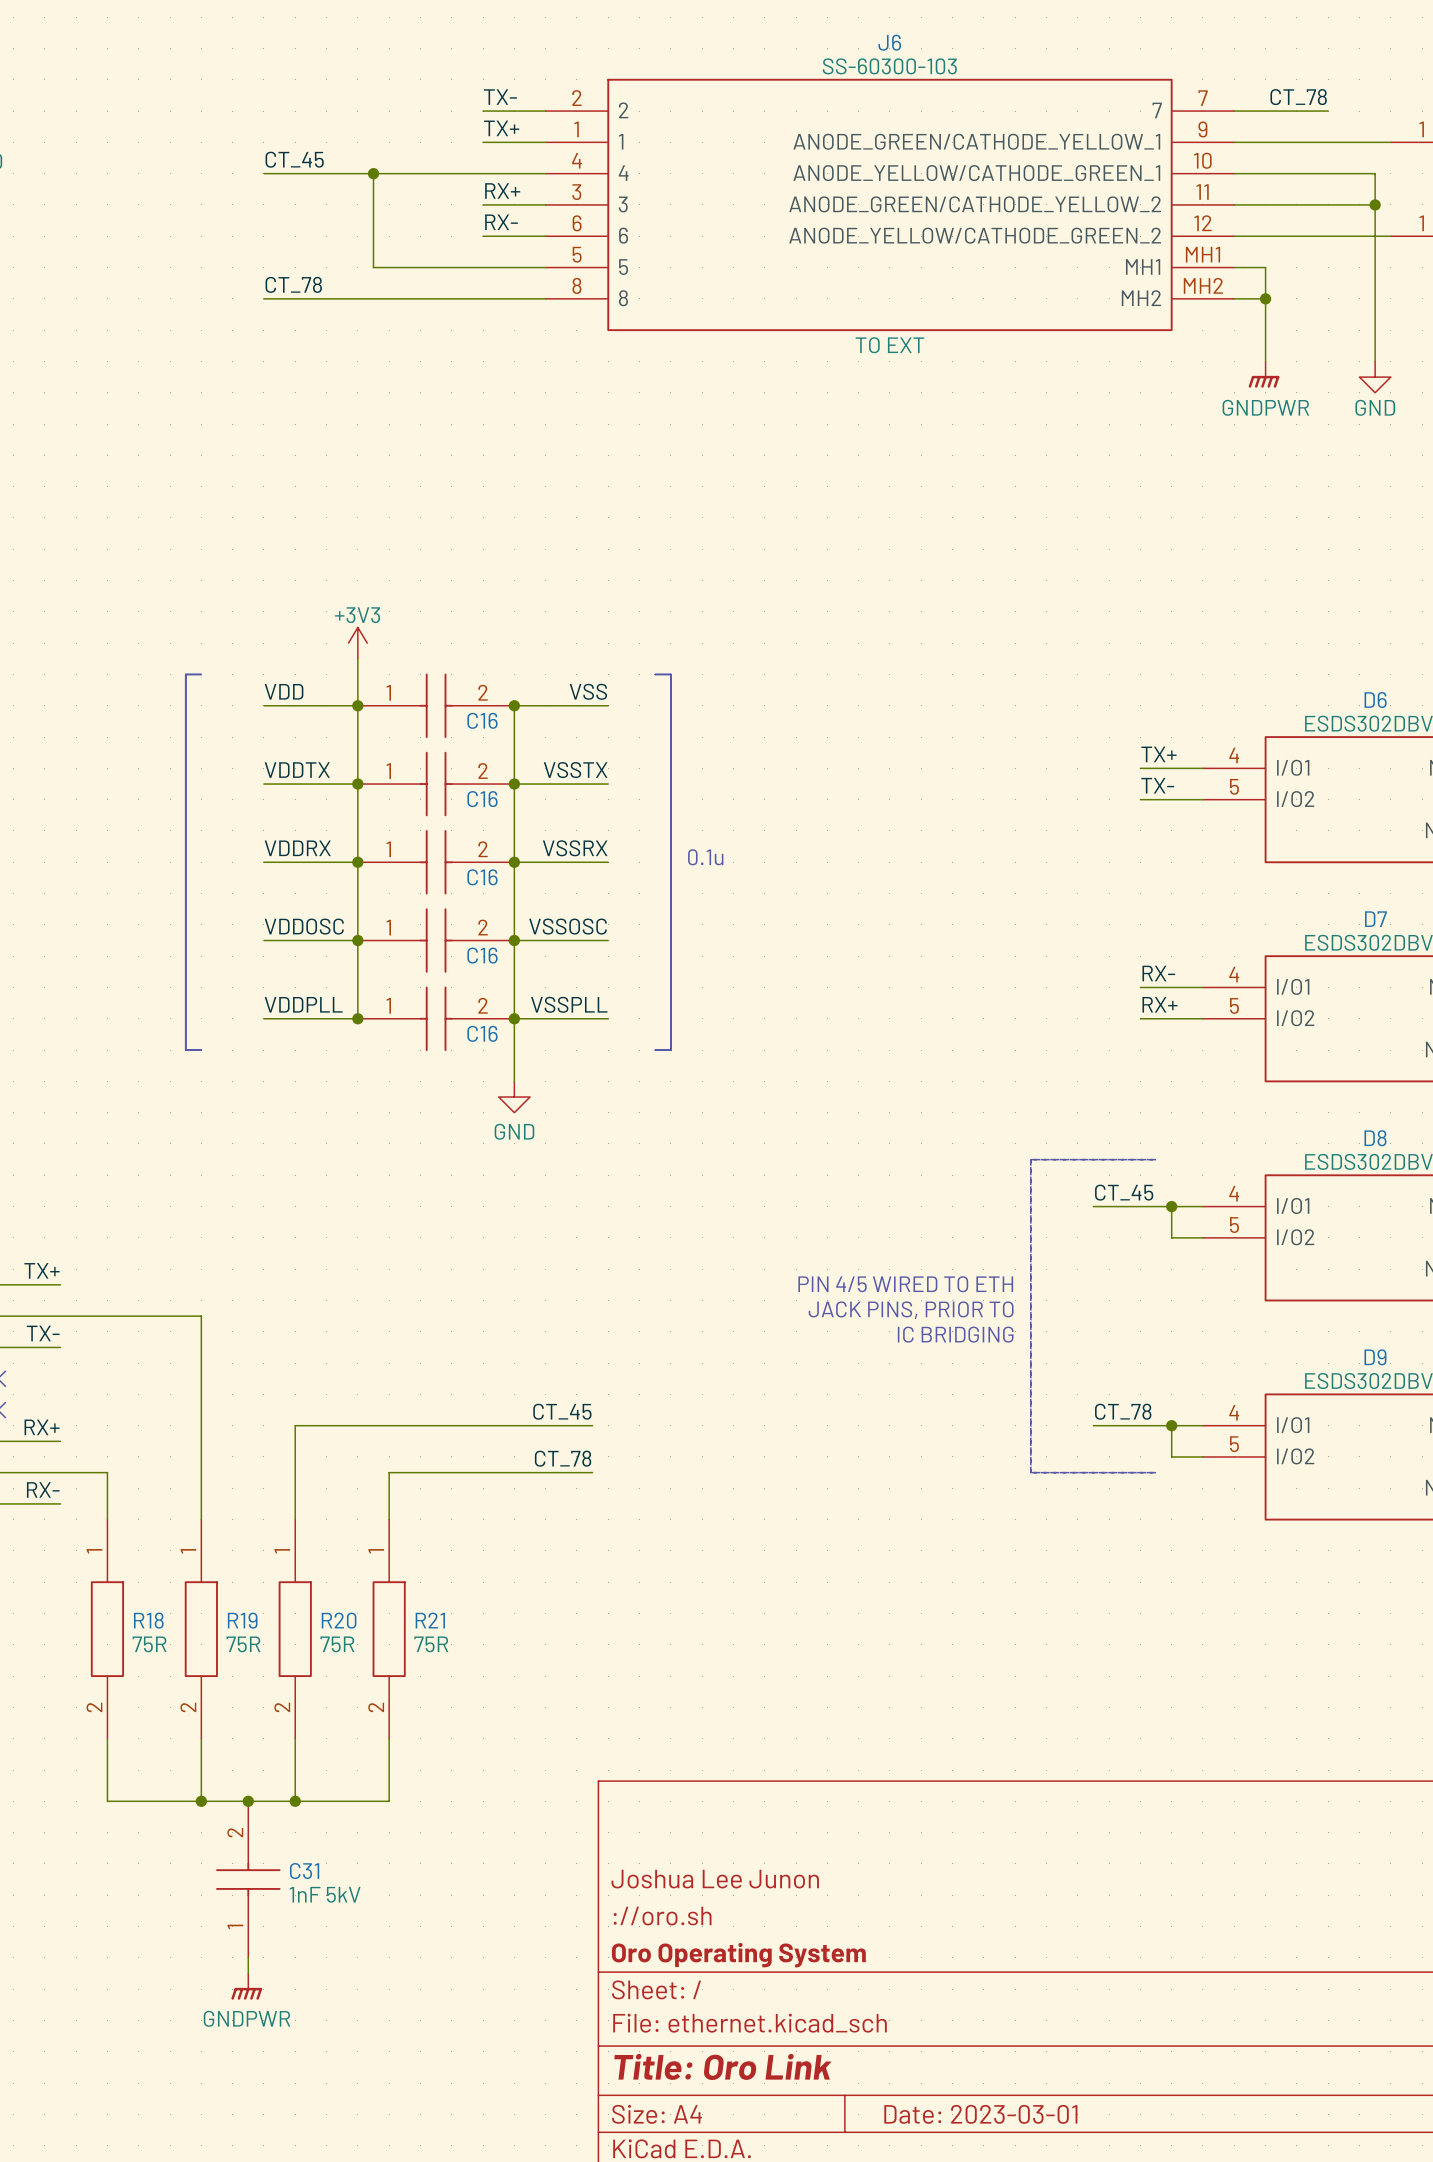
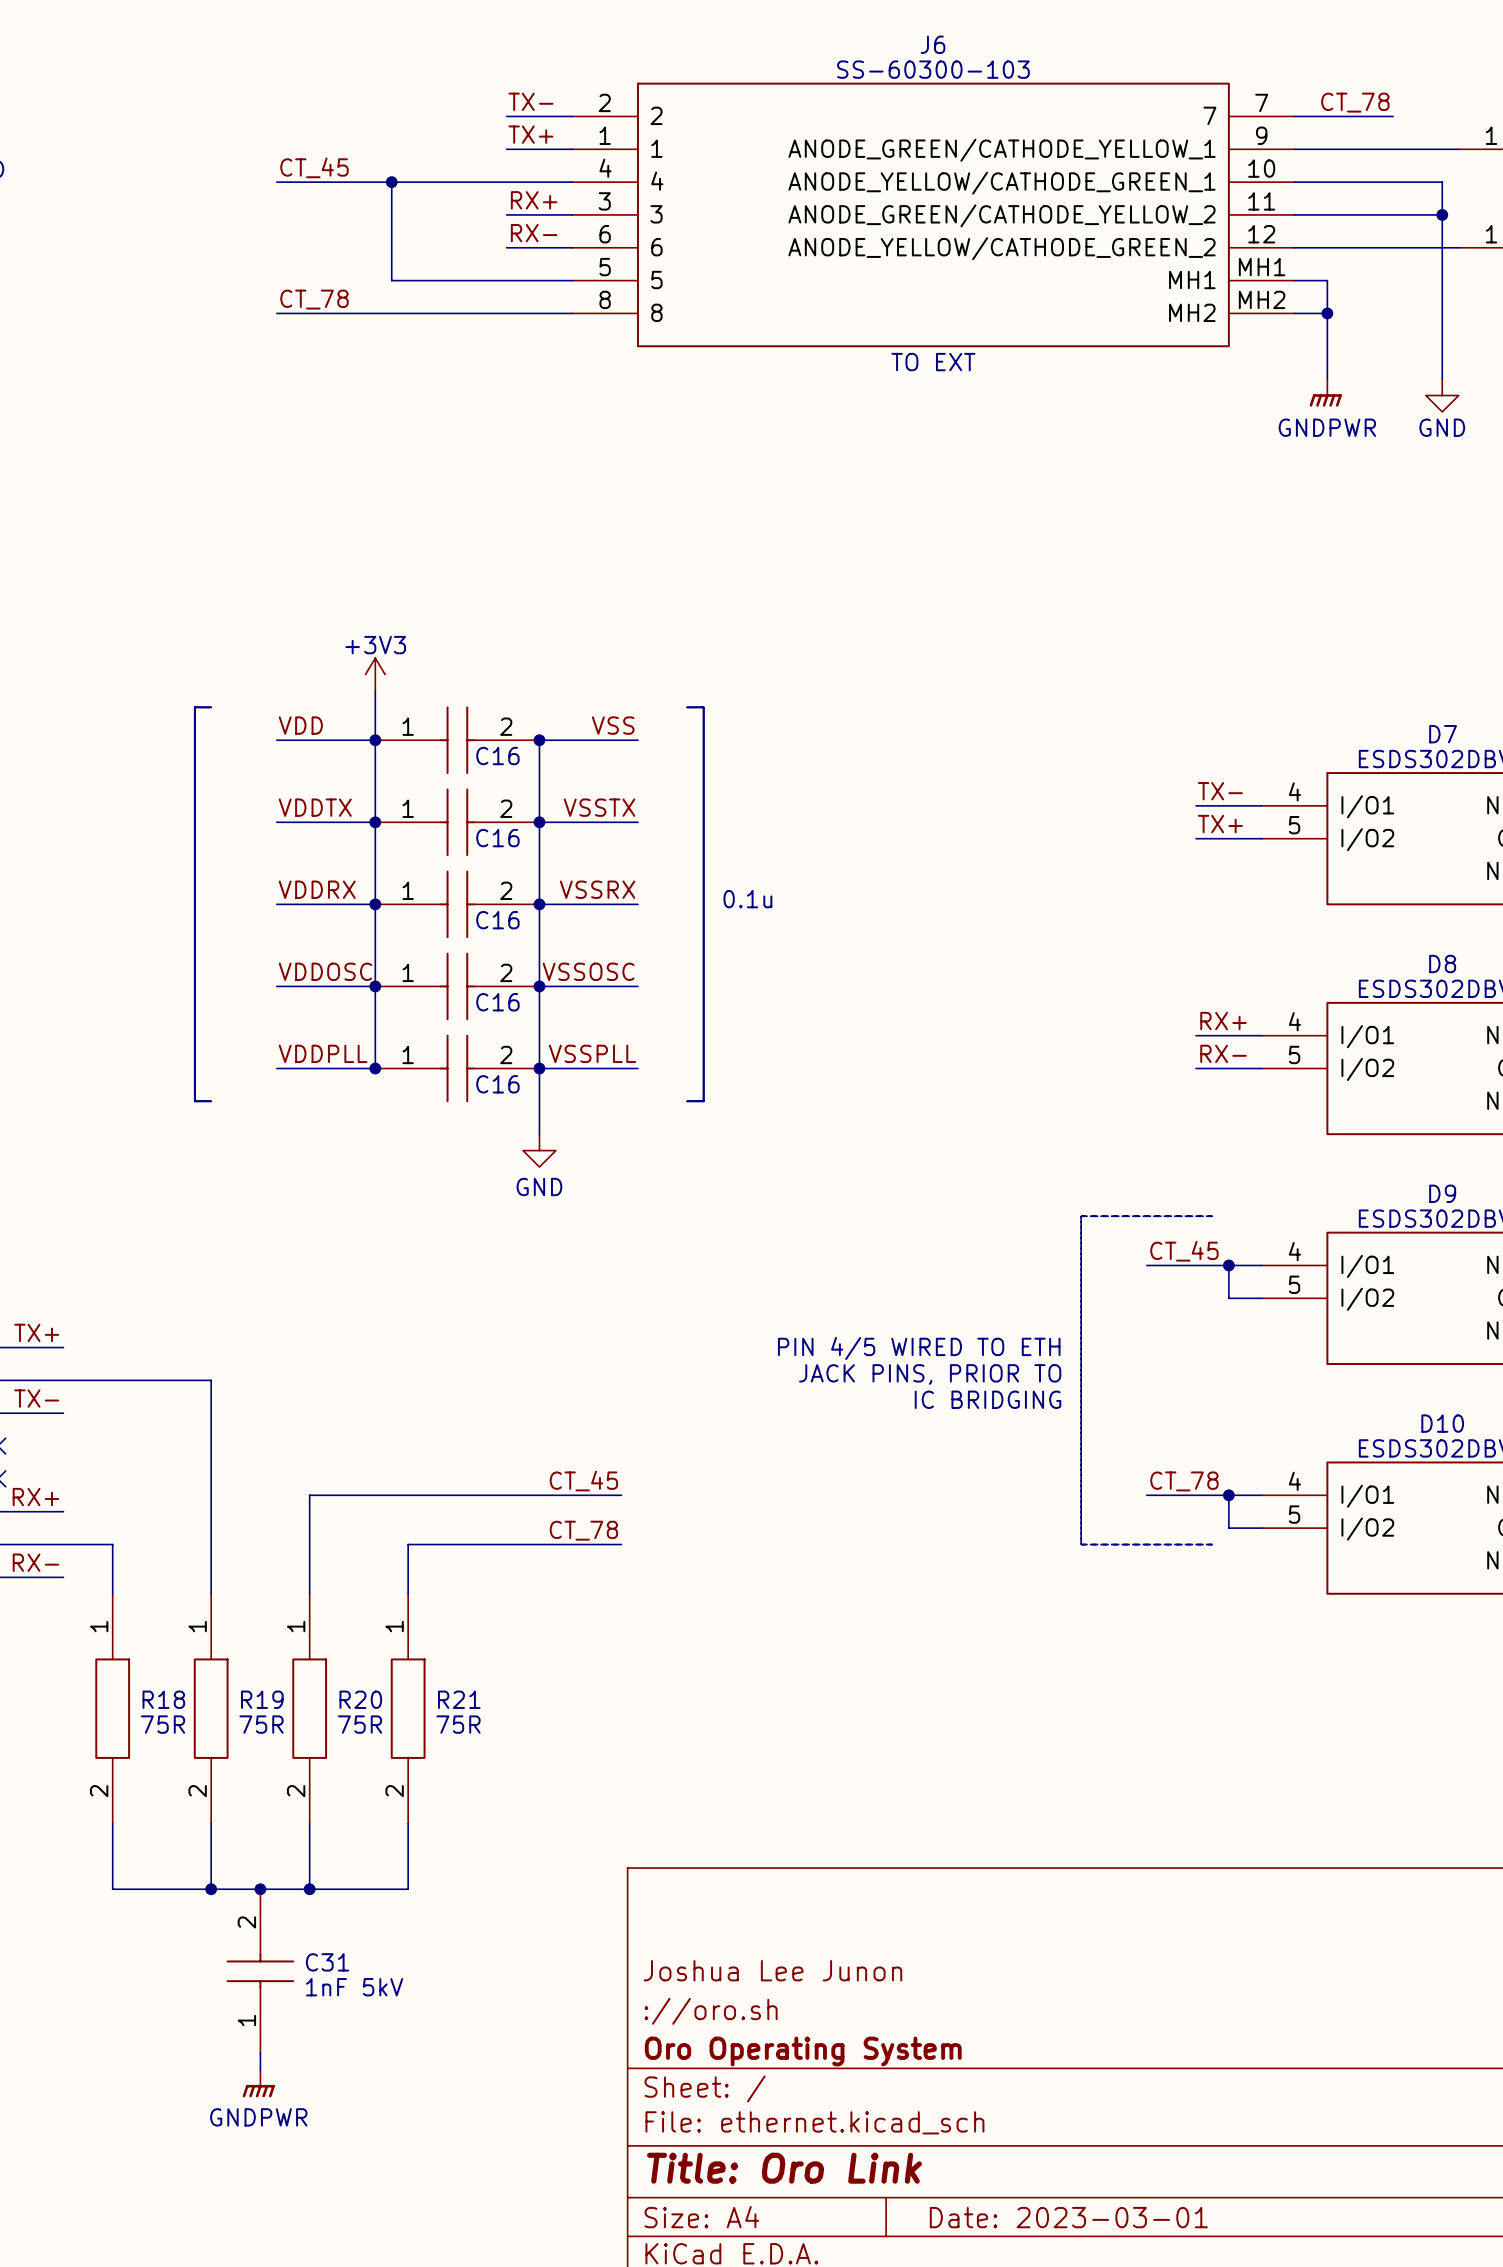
D6 name: D6 (1375, 700) -> D7 (1443, 734)
label: TX+ (1158, 754) -> TX- (1220, 791)
label: TX- (1157, 785) -> TX+ (1220, 824)
D7 name: D7 (1375, 919) -> D8 (1442, 963)
label: RX- (1158, 973) -> RX+ (1223, 1021)
label: RX+ (1160, 1004) -> RX- (1223, 1053)
D8 name: D8 (1375, 1138) -> D9 (1442, 1193)
D9 name: D9 (1375, 1357) -> D10 (1442, 1423)

